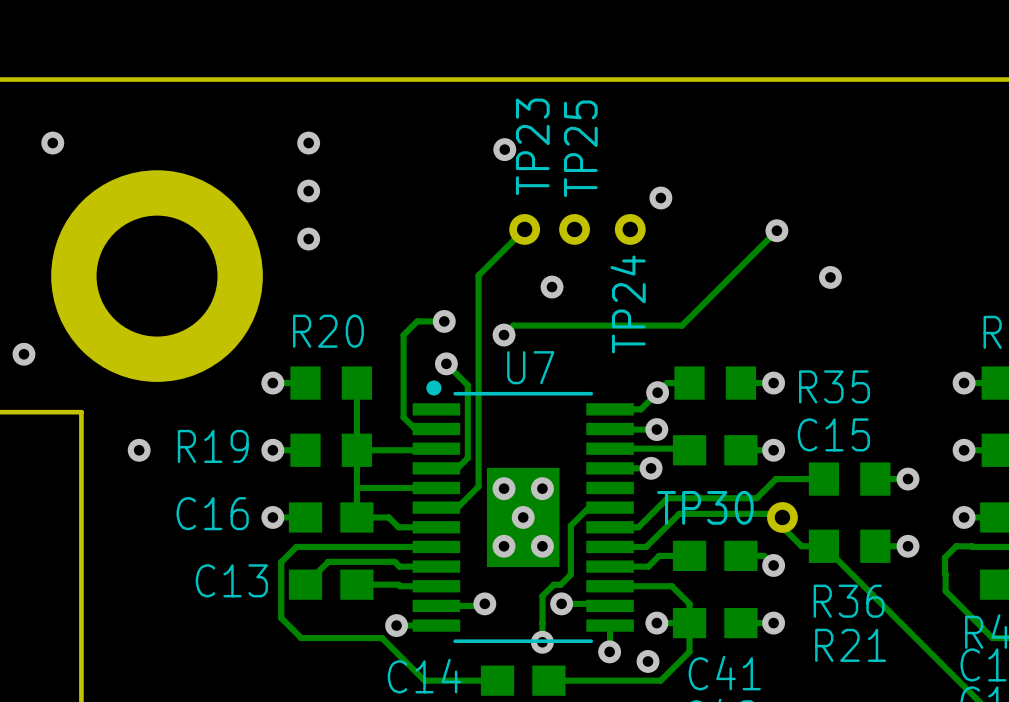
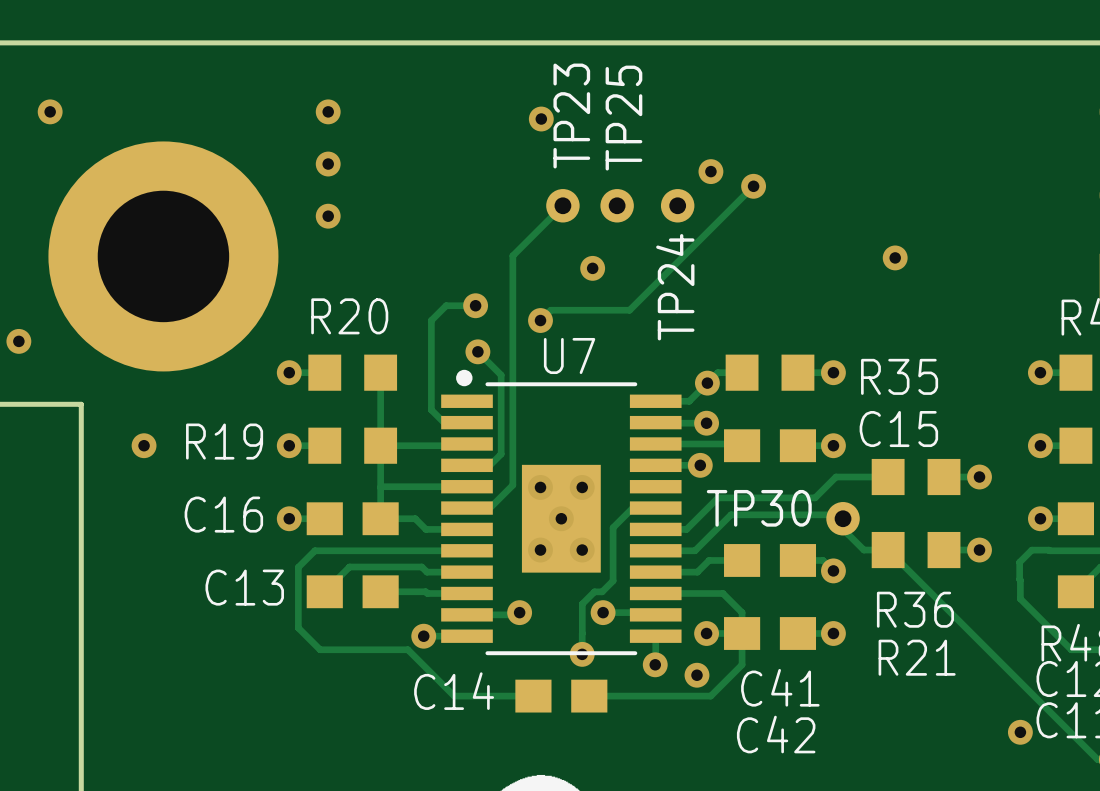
track: (776, 230) (682, 325) (586, 325) -> (753, 186) (629, 310)
via position: (776, 230) -> (753, 186)

